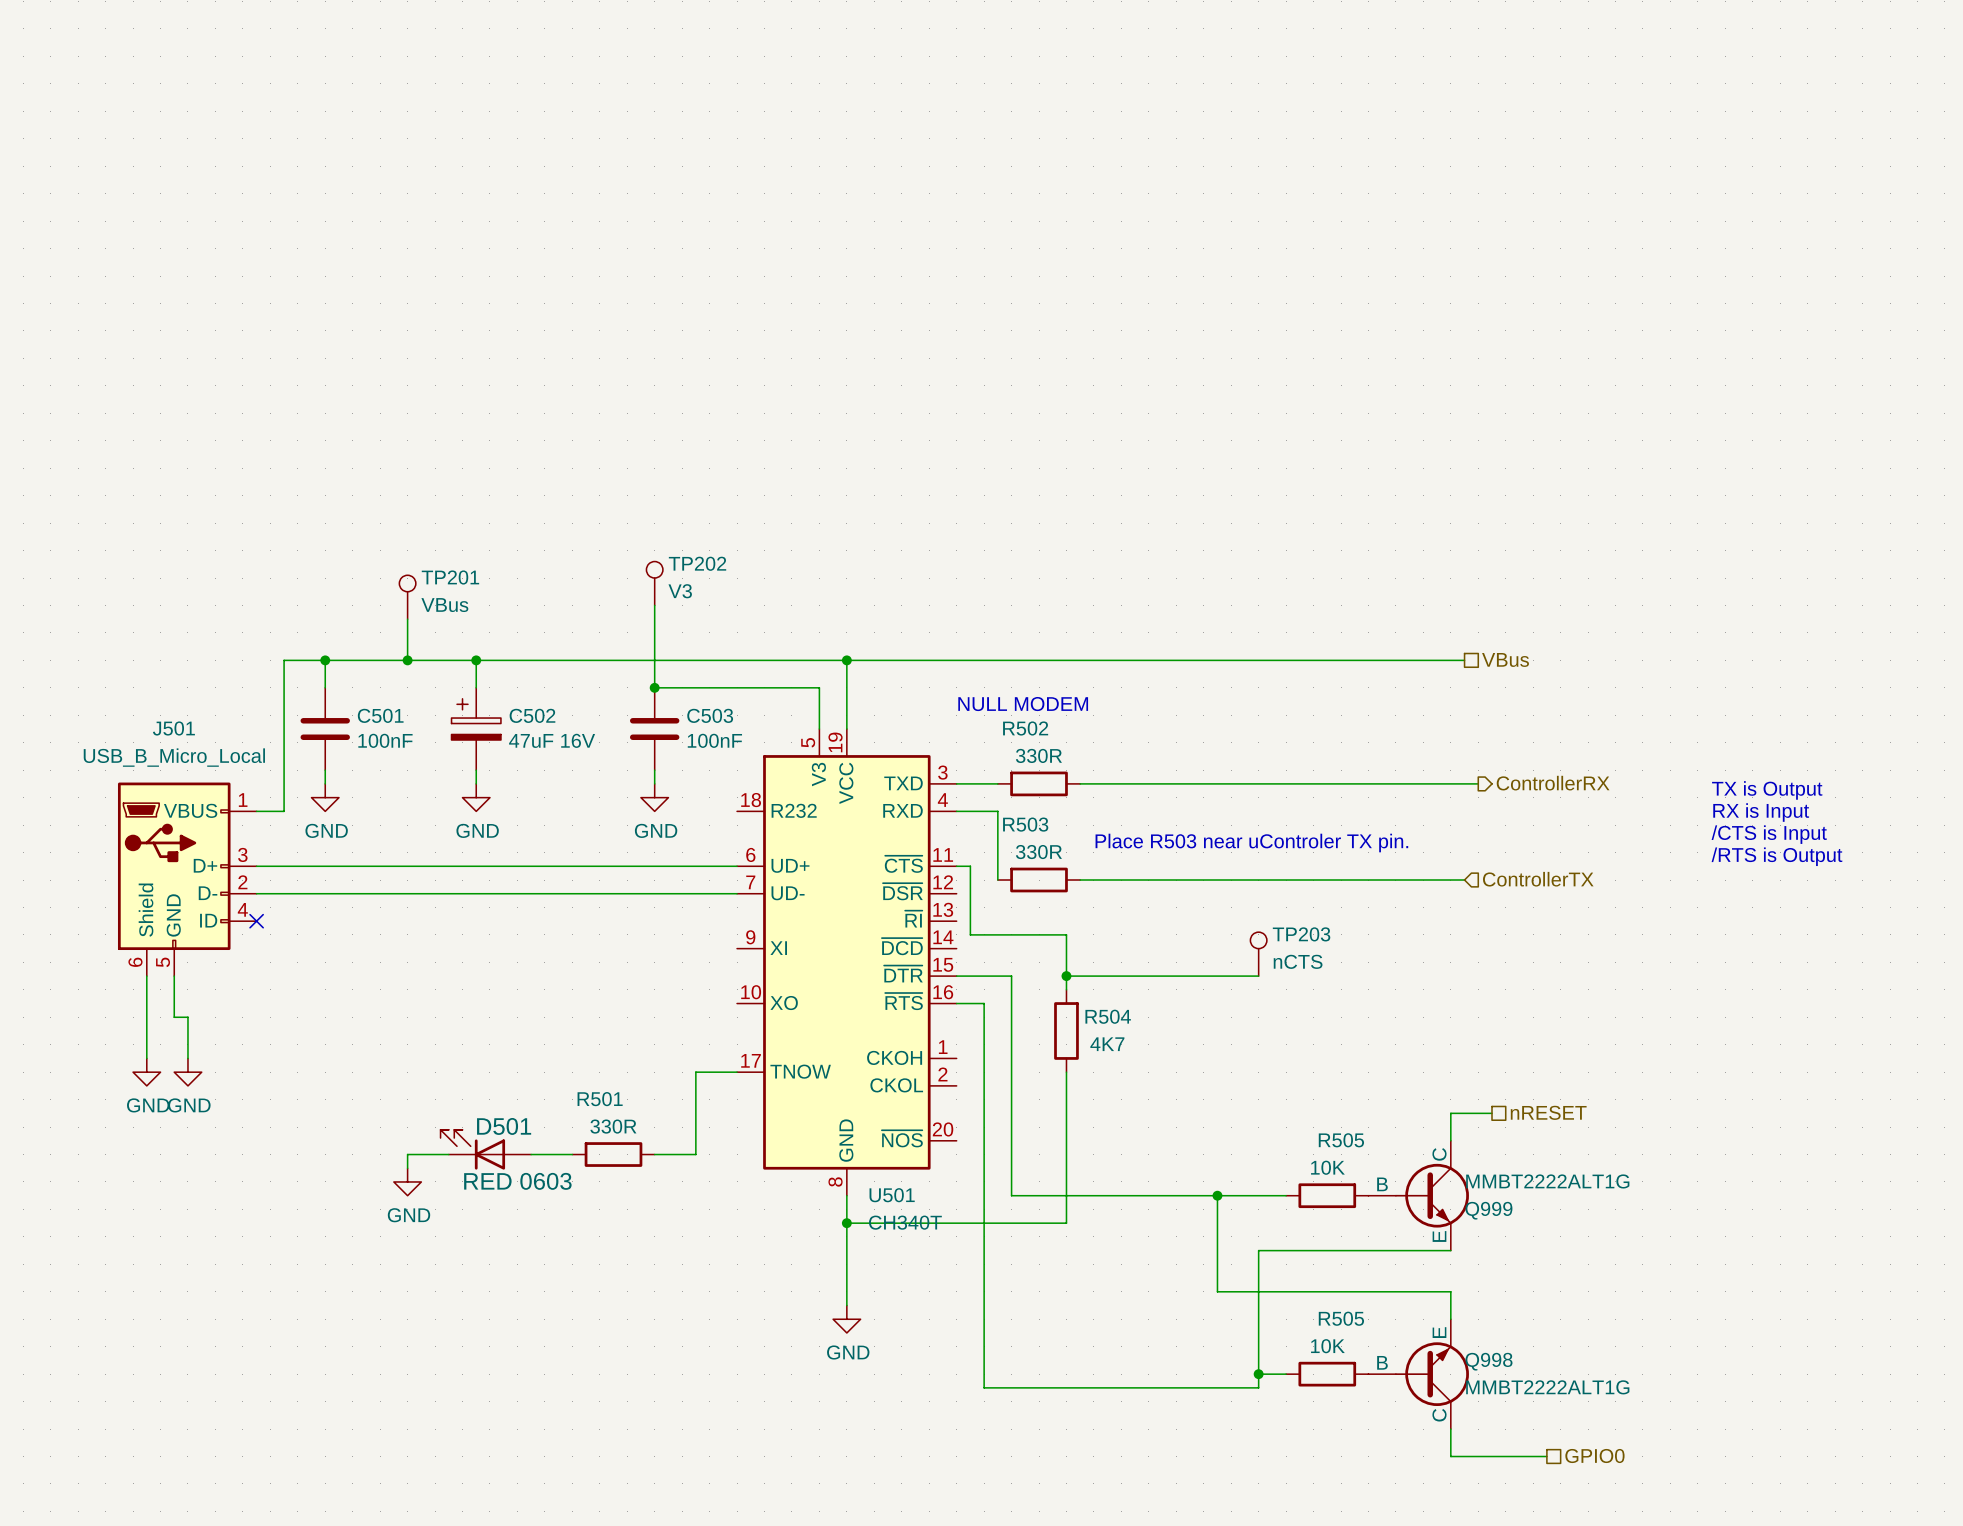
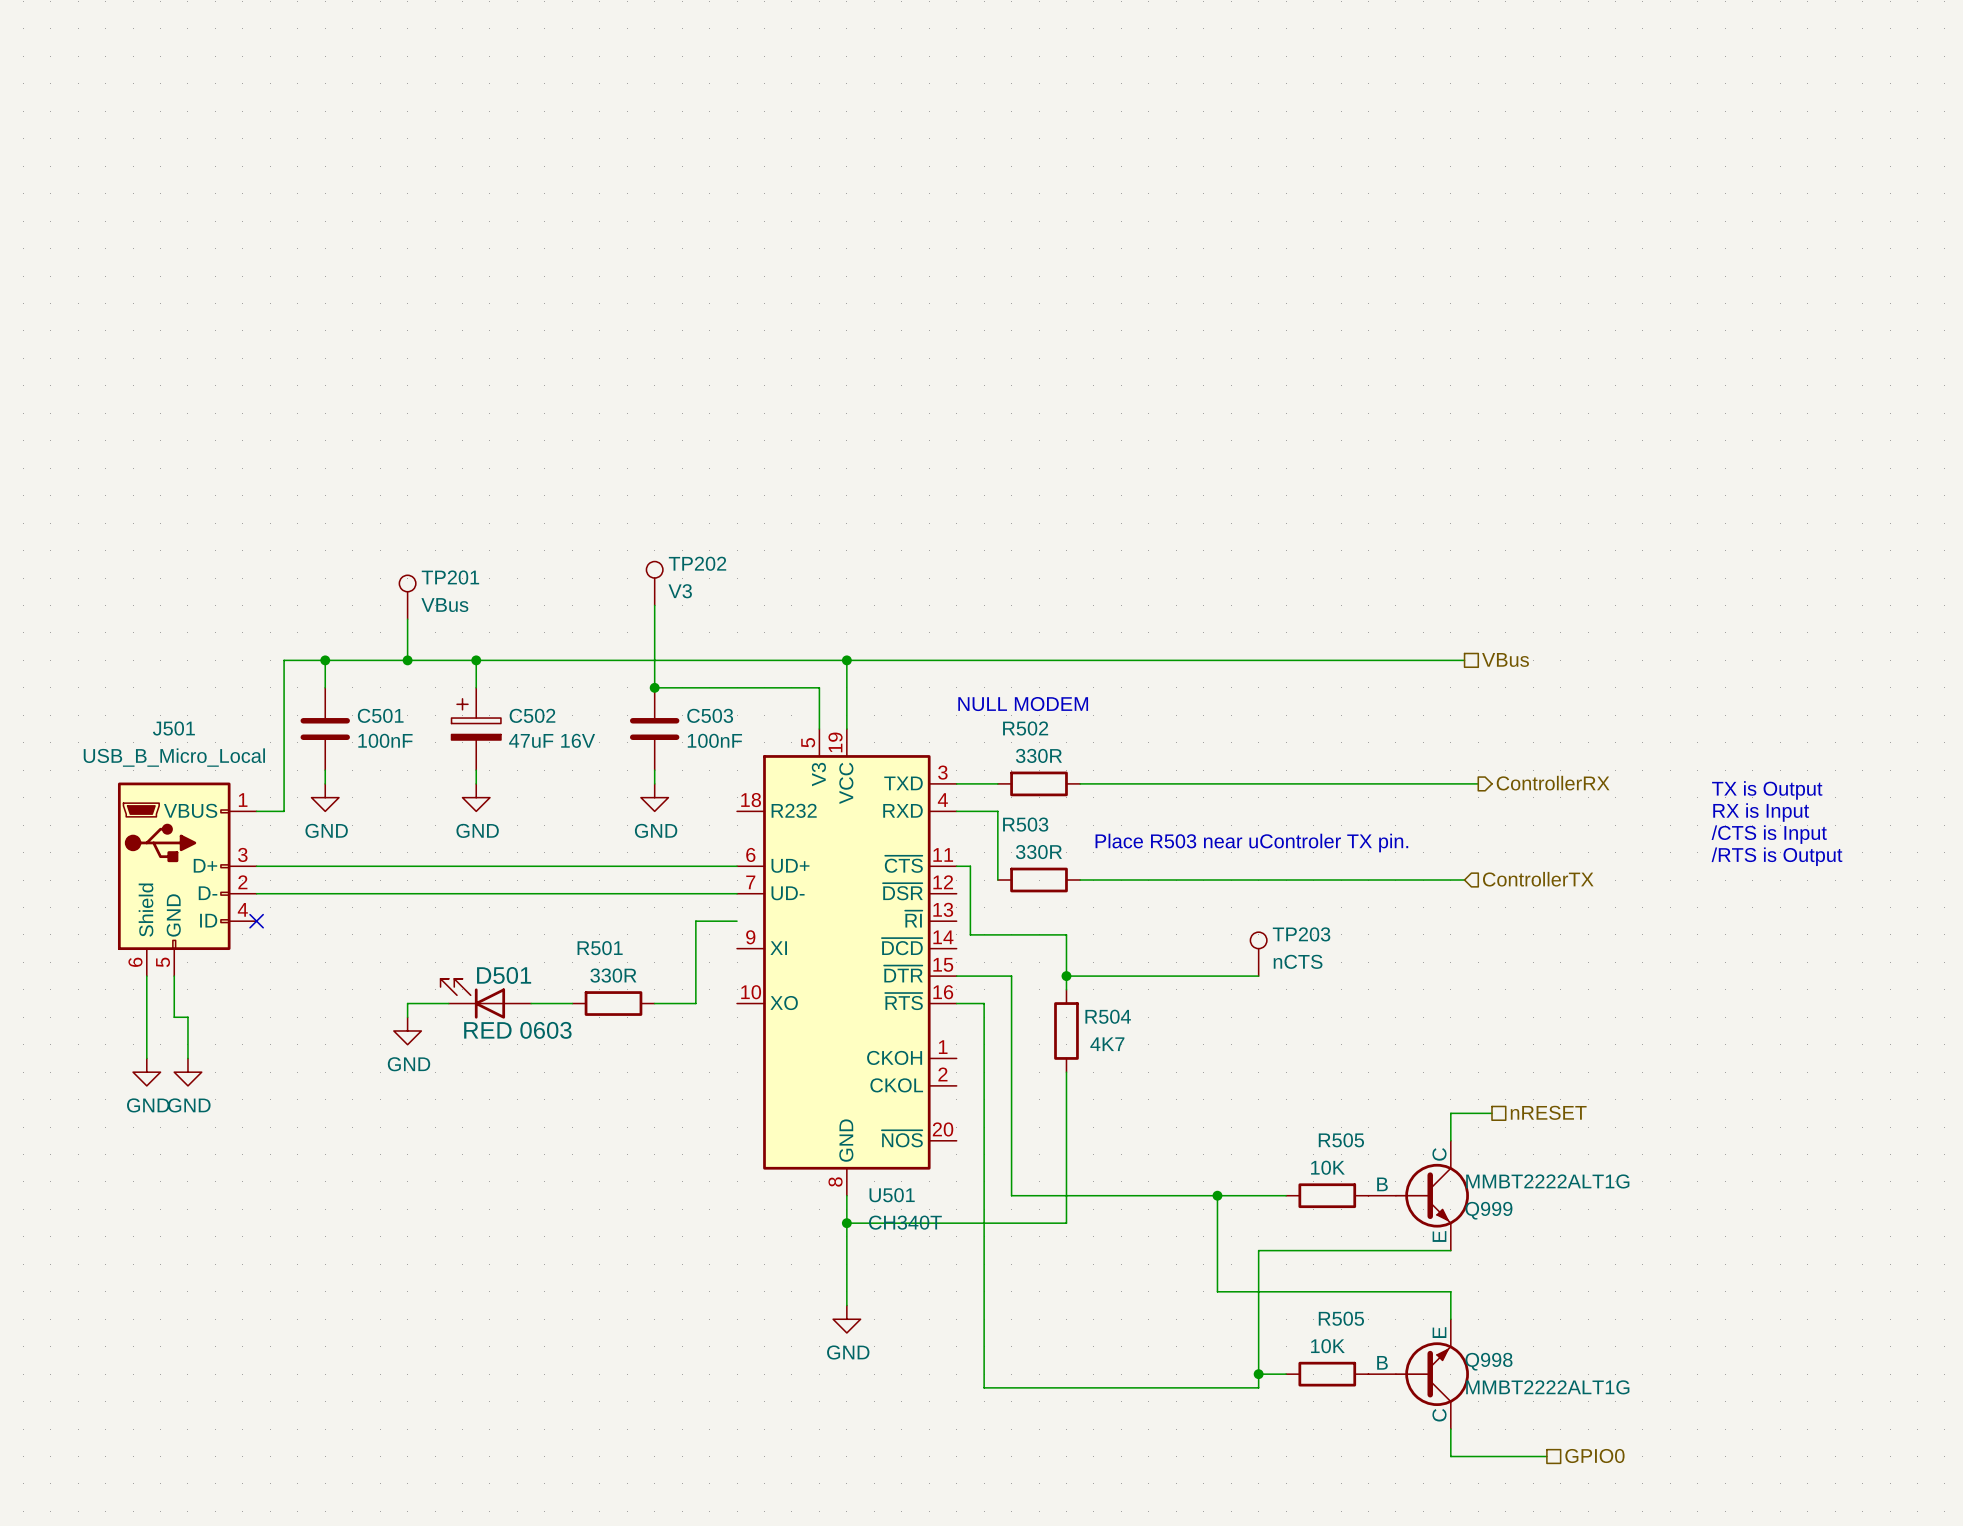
U501 symbol: [737, 729, 957, 1196] -> [737, 729, 957, 1196]
wire: (737, 1072) (695, 1072) (695, 1154) (654, 1154) -> (737, 921) (695, 921) (695, 1003) (654, 1003)
D501 position: (485, 1149) -> (485, 998)
wire: (448, 1154) (407, 1154) (407, 1168) -> (448, 1003) (407, 1003) (407, 1017)
wire: (531, 1154) (572, 1154) -> (531, 1003) (572, 1003)
R501 position: (613, 1154) -> (613, 1003)
power symbol position: GND (407, 1181) -> GND (407, 1030)

